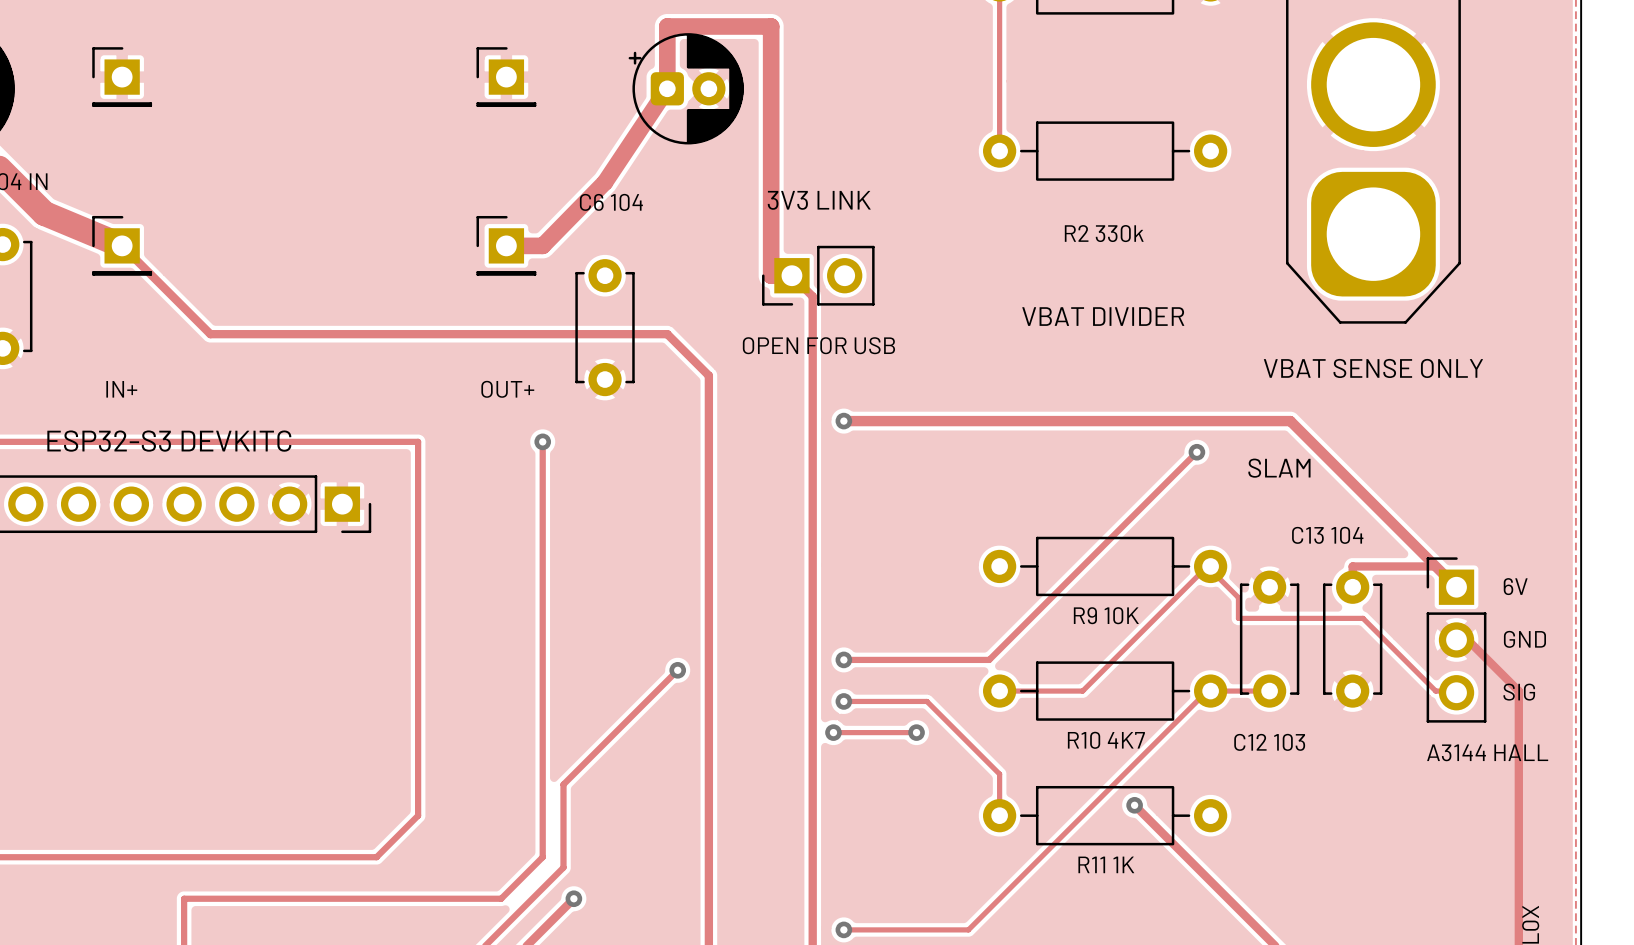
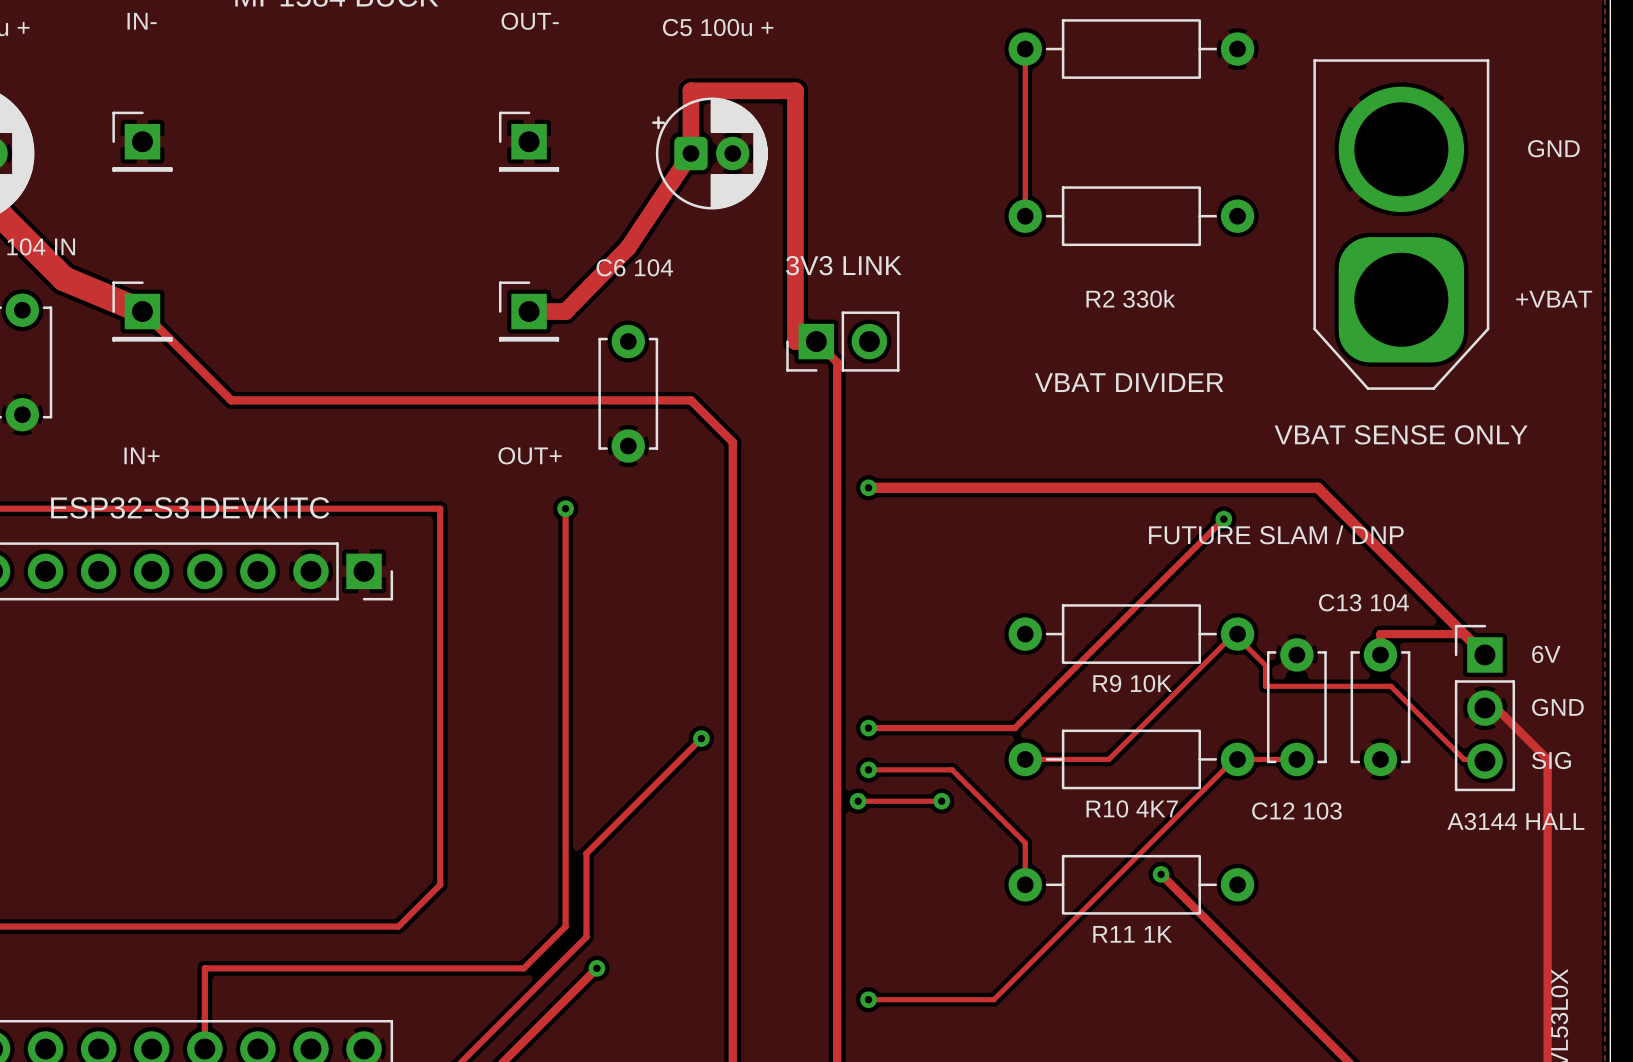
text: none -> GND (1553, 148)
text: none -> +VBAT (1554, 299)
text: OPEN FOR USB (818, 345) -> none
text: none -> FUTURE SLAM / DNP (1276, 534)
text: SLAM (1279, 468) -> none

